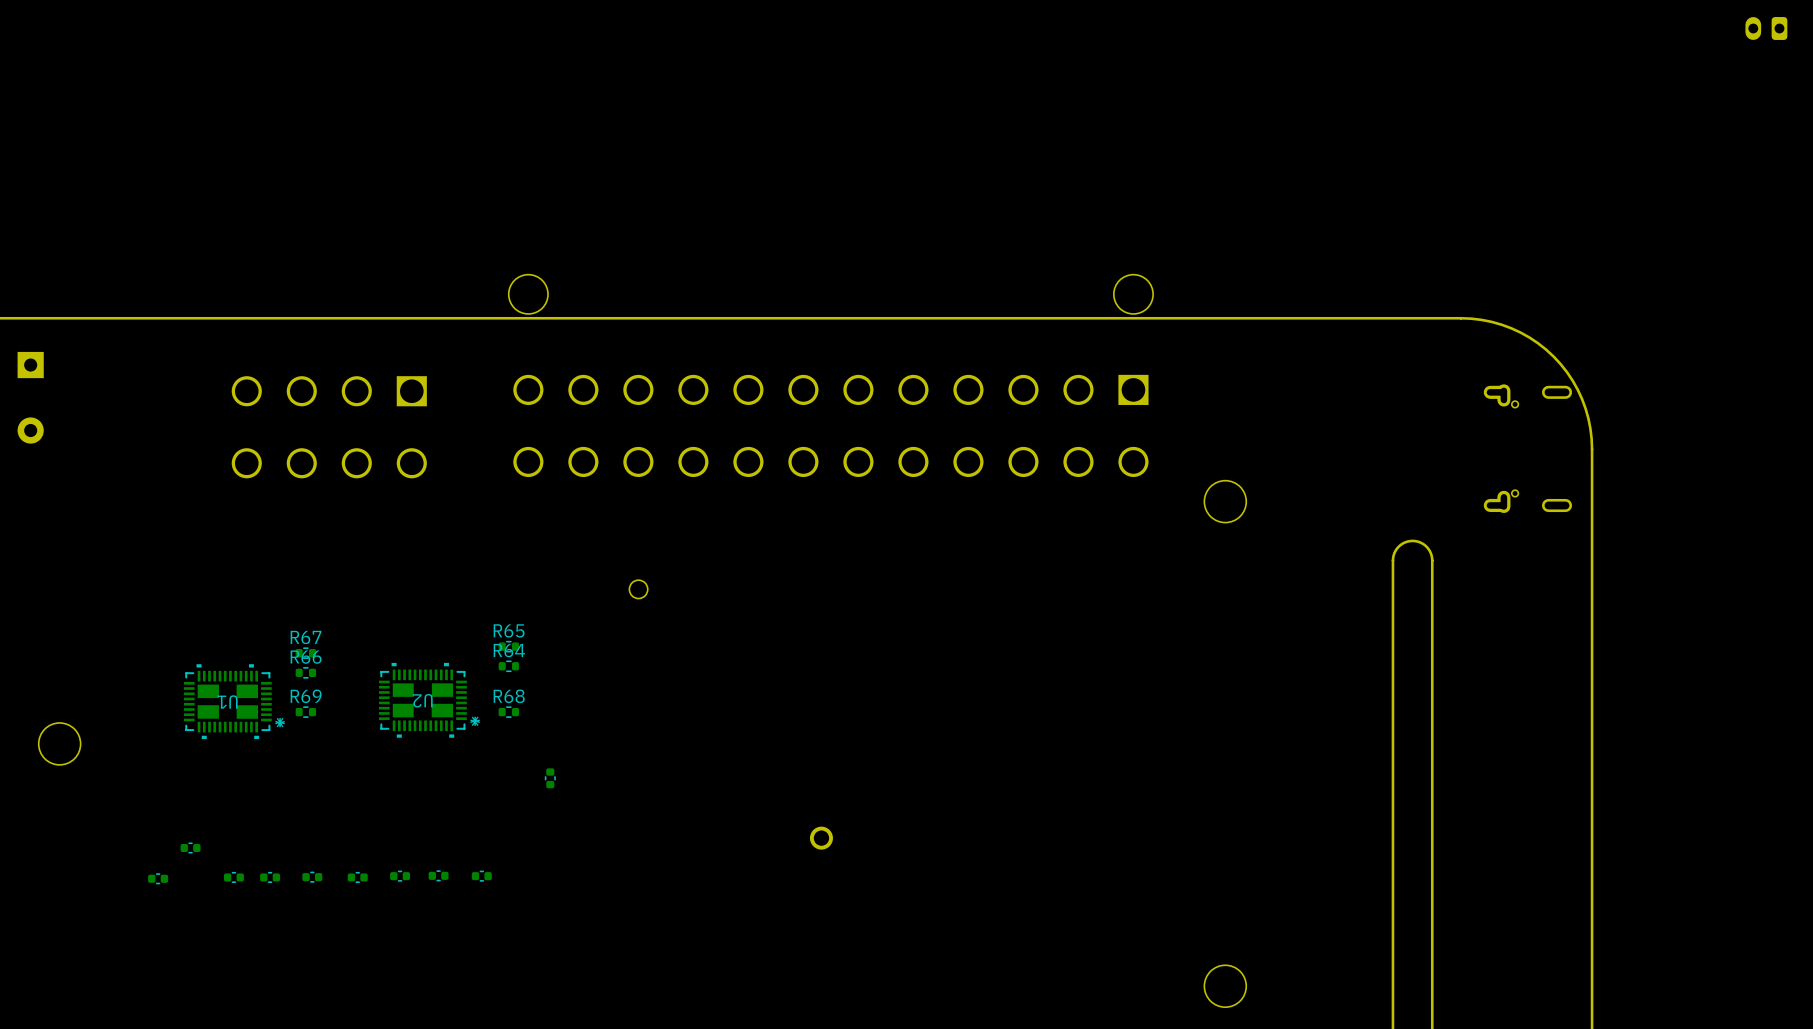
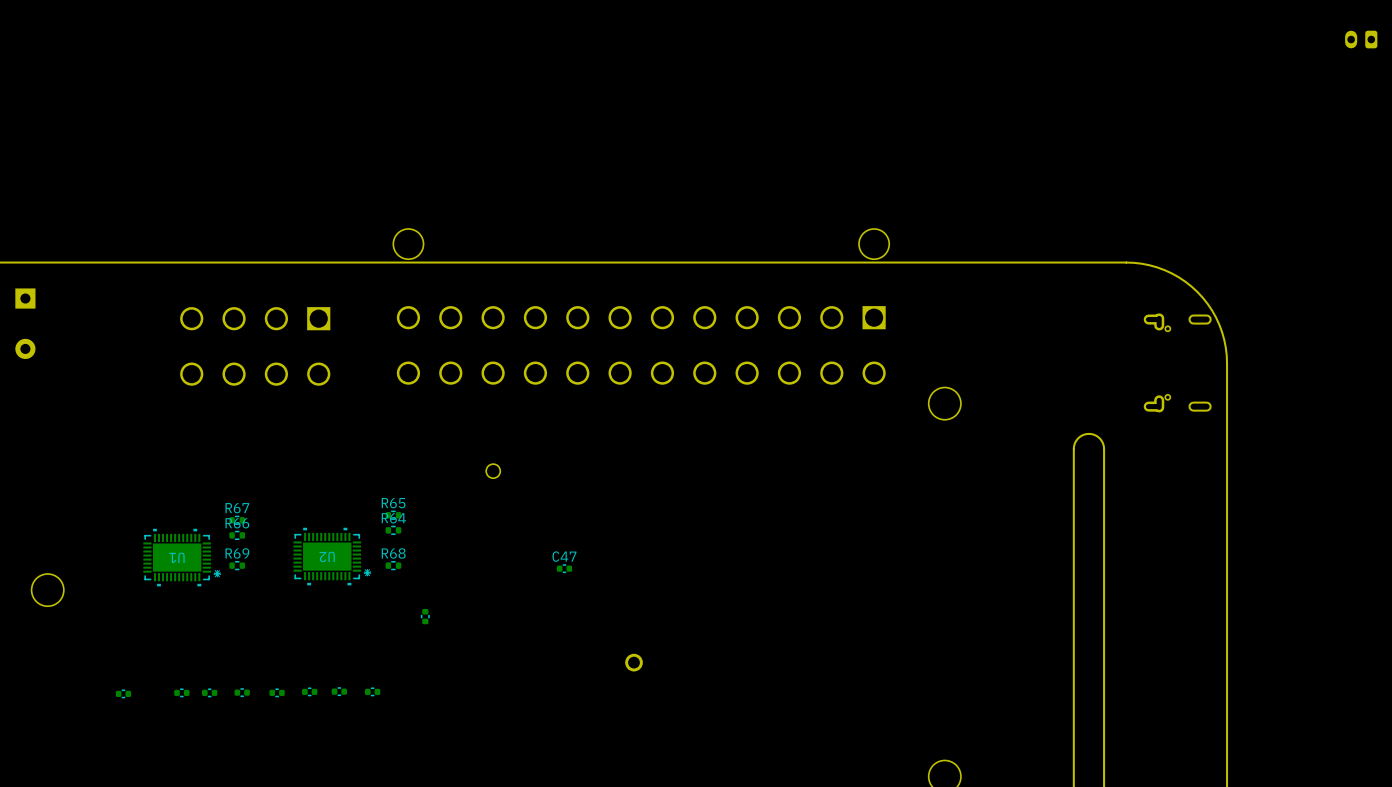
U2 footprint: [378, 662, 467, 738] -> [293, 527, 362, 586]
U1 footprint: [183, 664, 272, 740] -> [143, 528, 211, 587]
C47: none -> (564, 568)
part: (190, 848) -> none

